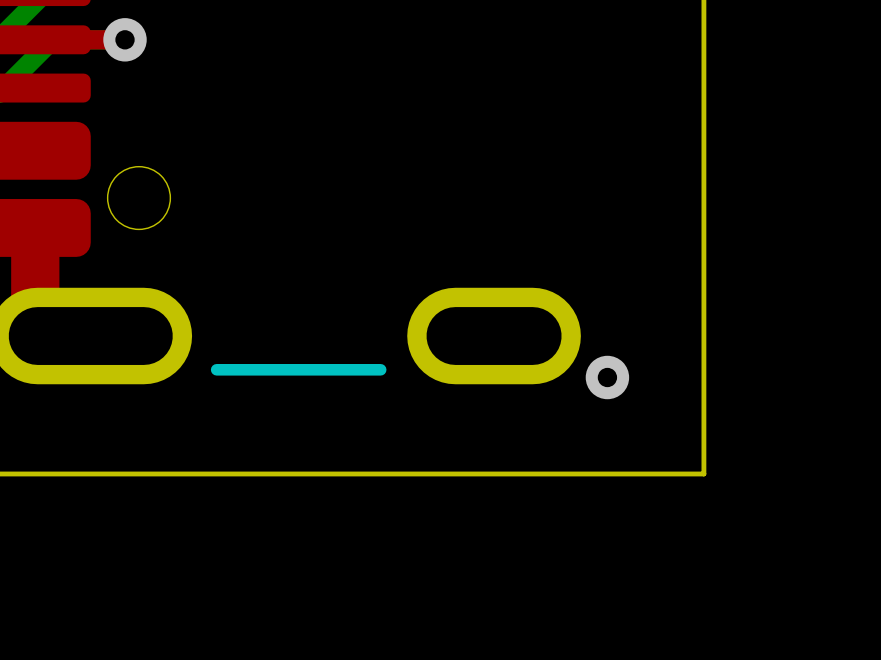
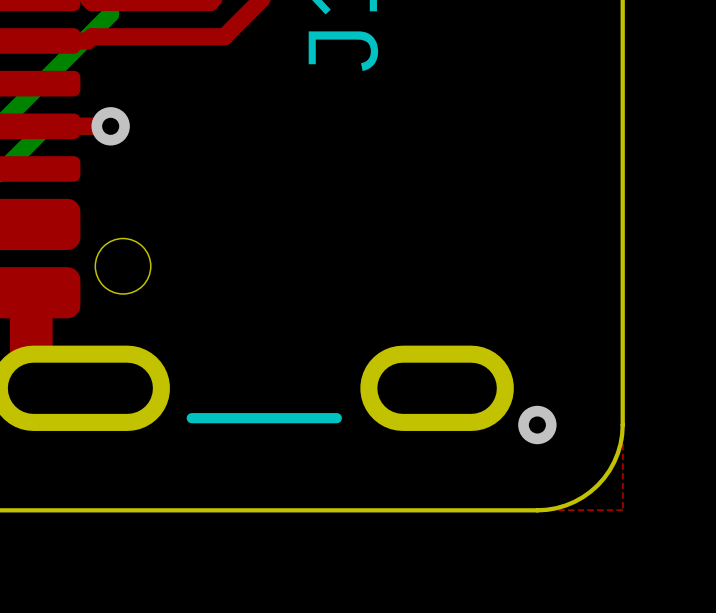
board edge: (703, 377) (703, 473) (607, 473) -> (622, 425) (620, 443) (614, 462) (597, 485) (574, 501) (556, 508) (537, 510)

